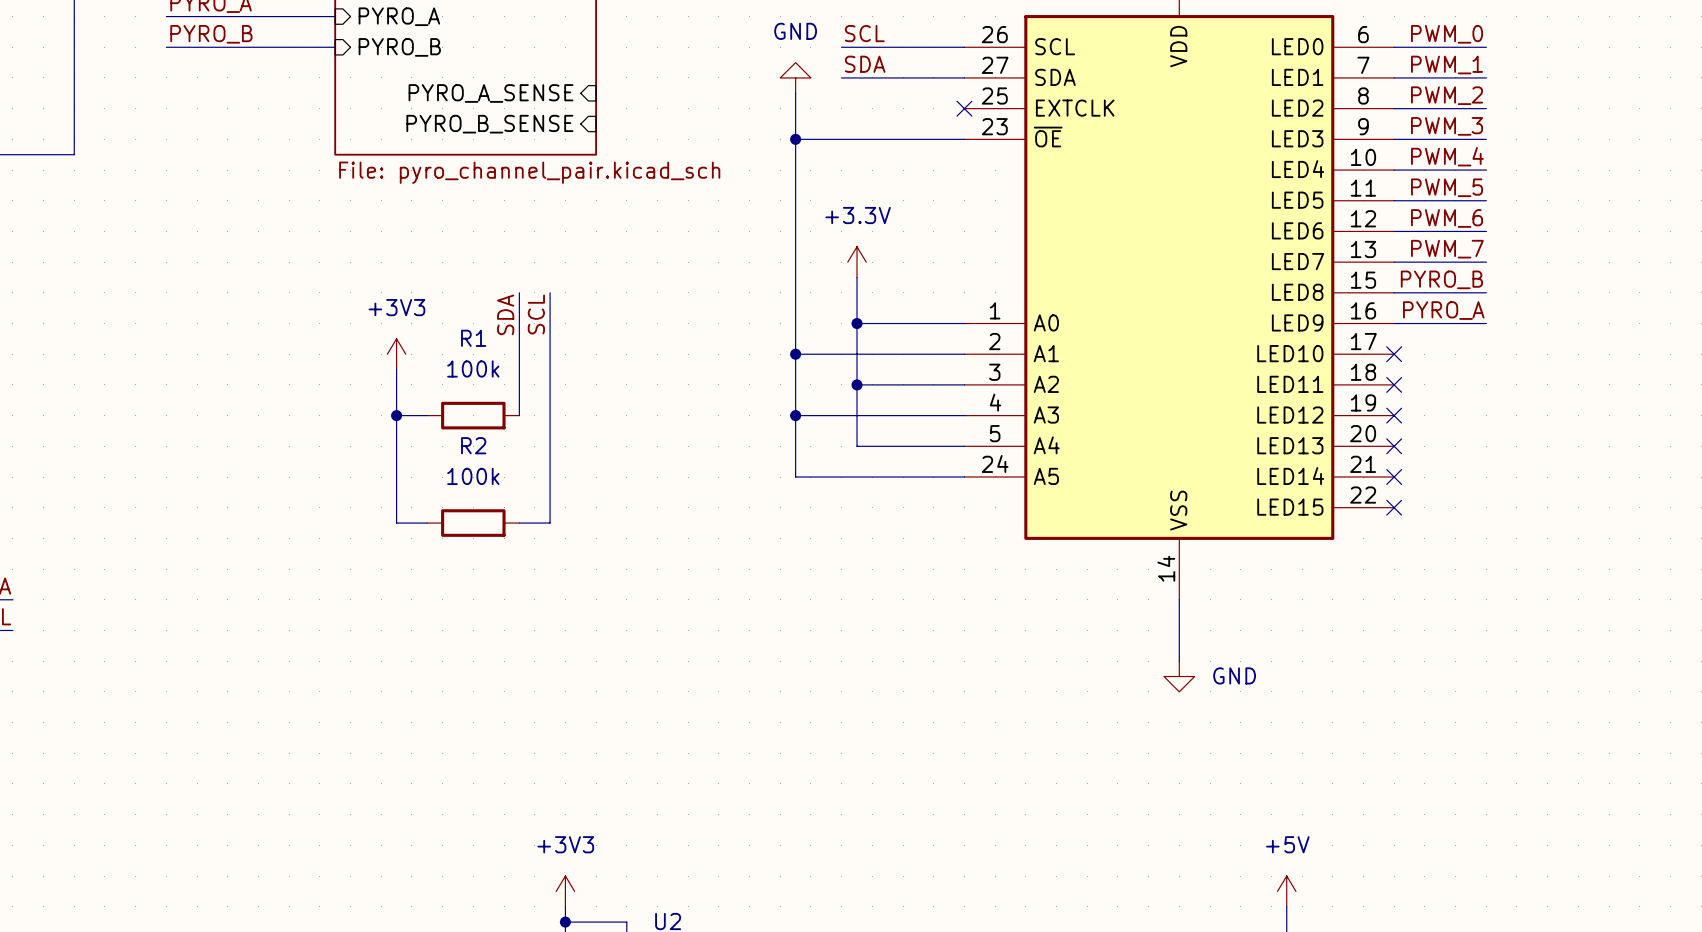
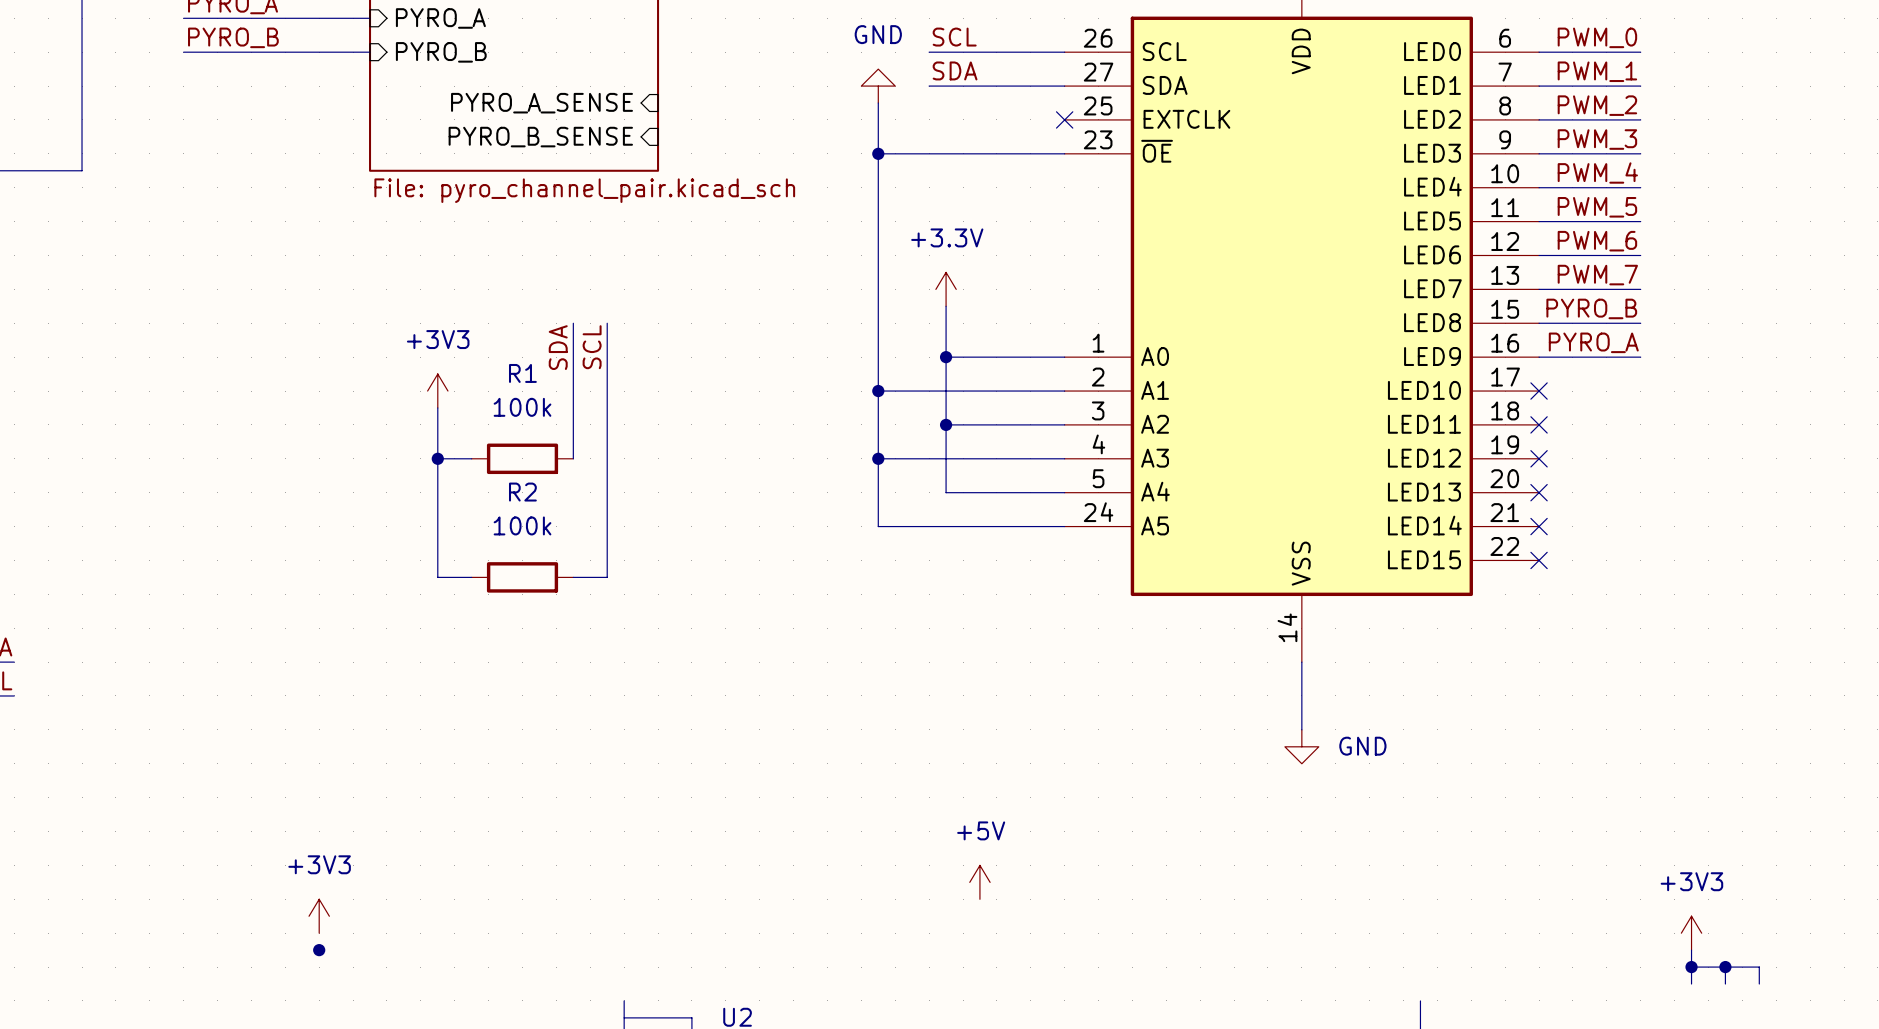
power symbol: none -> +5V (979, 882)
power symbol: none -> +3V3 (1691, 933)
junction: none -> (319, 950)
wire: none -> (1691, 950) (1691, 984)
wire: none -> (1691, 967) (1759, 967) (1759, 984)
junction: none -> (1691, 967)
wire: none -> (1725, 967) (1725, 984)
junction: none -> (1725, 967)
power symbol position: +3V3 (565, 891) -> +3V3 (319, 916)
power symbol: +5V (1286, 891) -> none
junction: (565, 922) -> none

